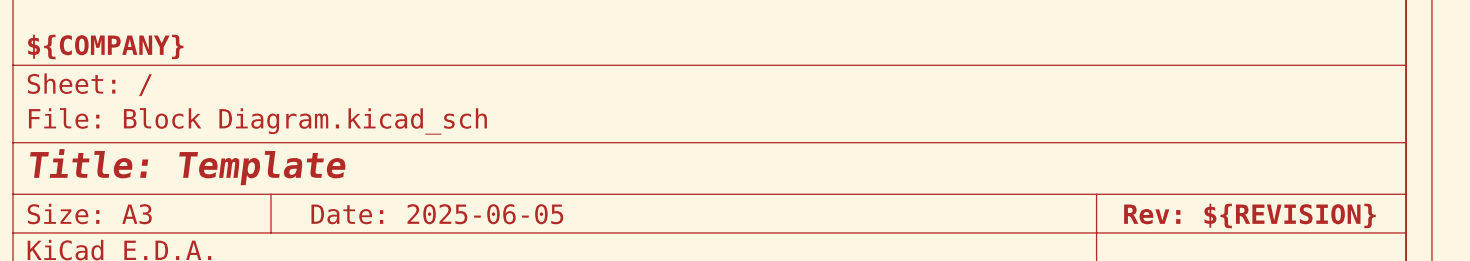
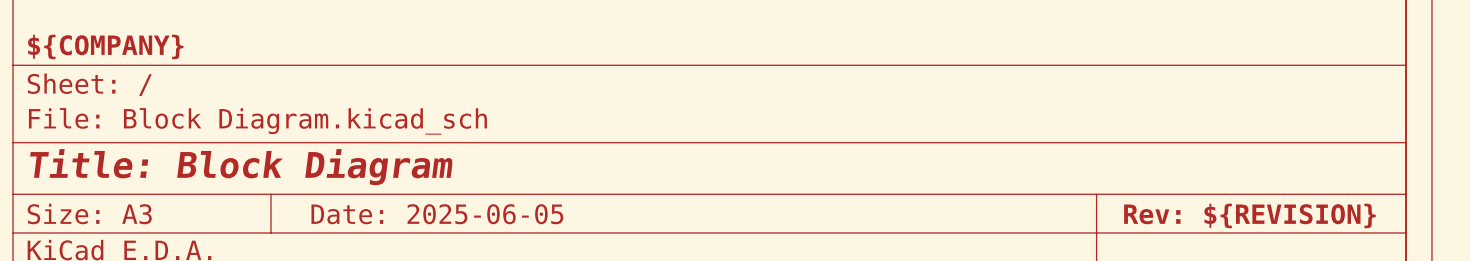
title block: Title: Template (188, 167) -> Title: Block Diagram (241, 167)

